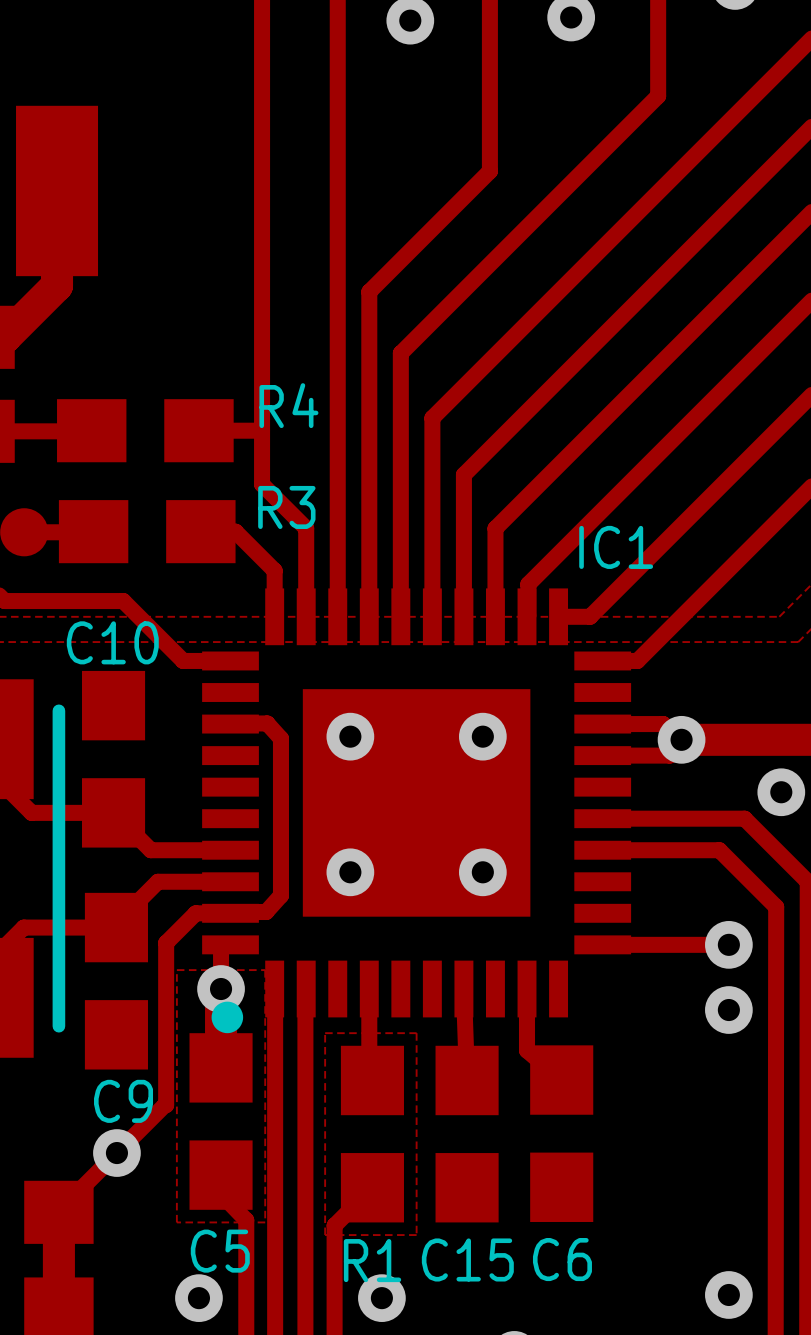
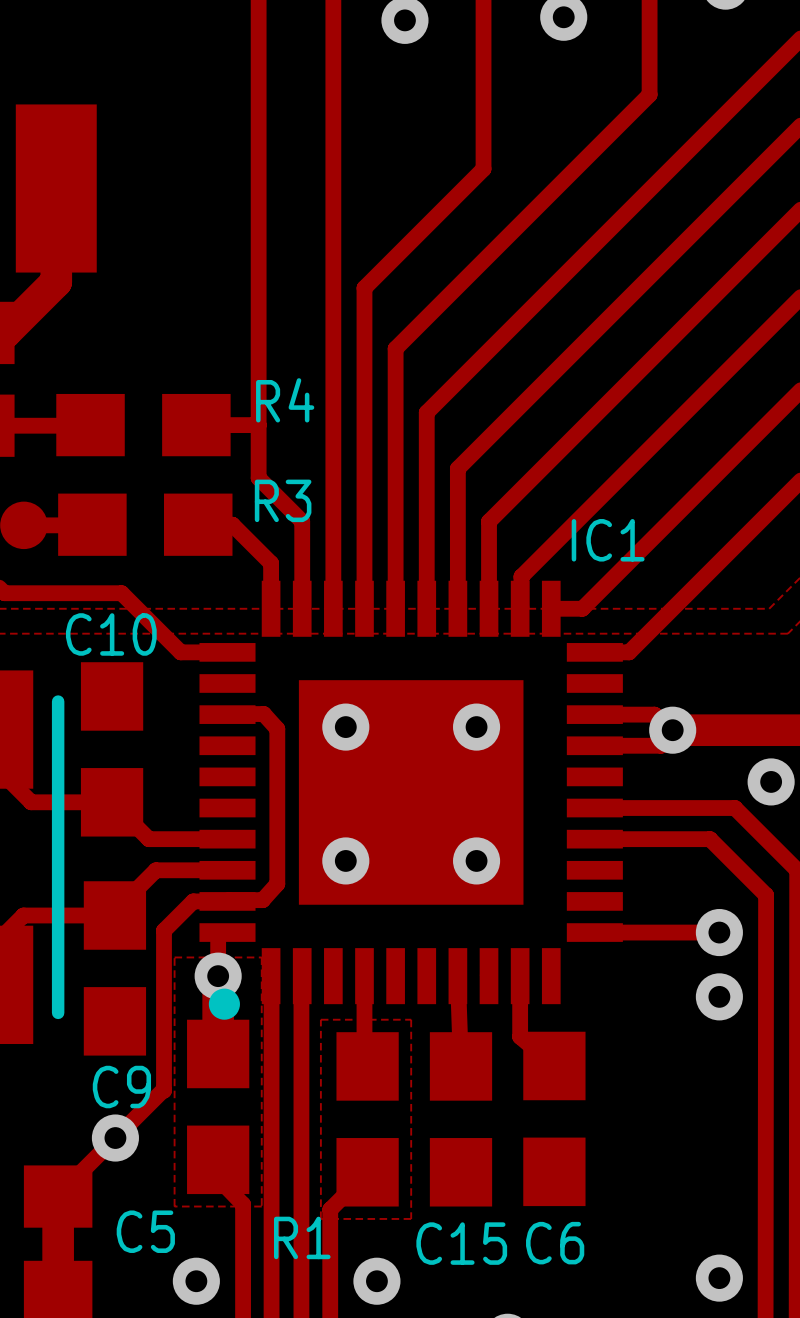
C5 name position: C5 (220, 1251) -> C5 (145, 1231)
R1 name position: R1 (372, 1260) -> R1 (302, 1237)

